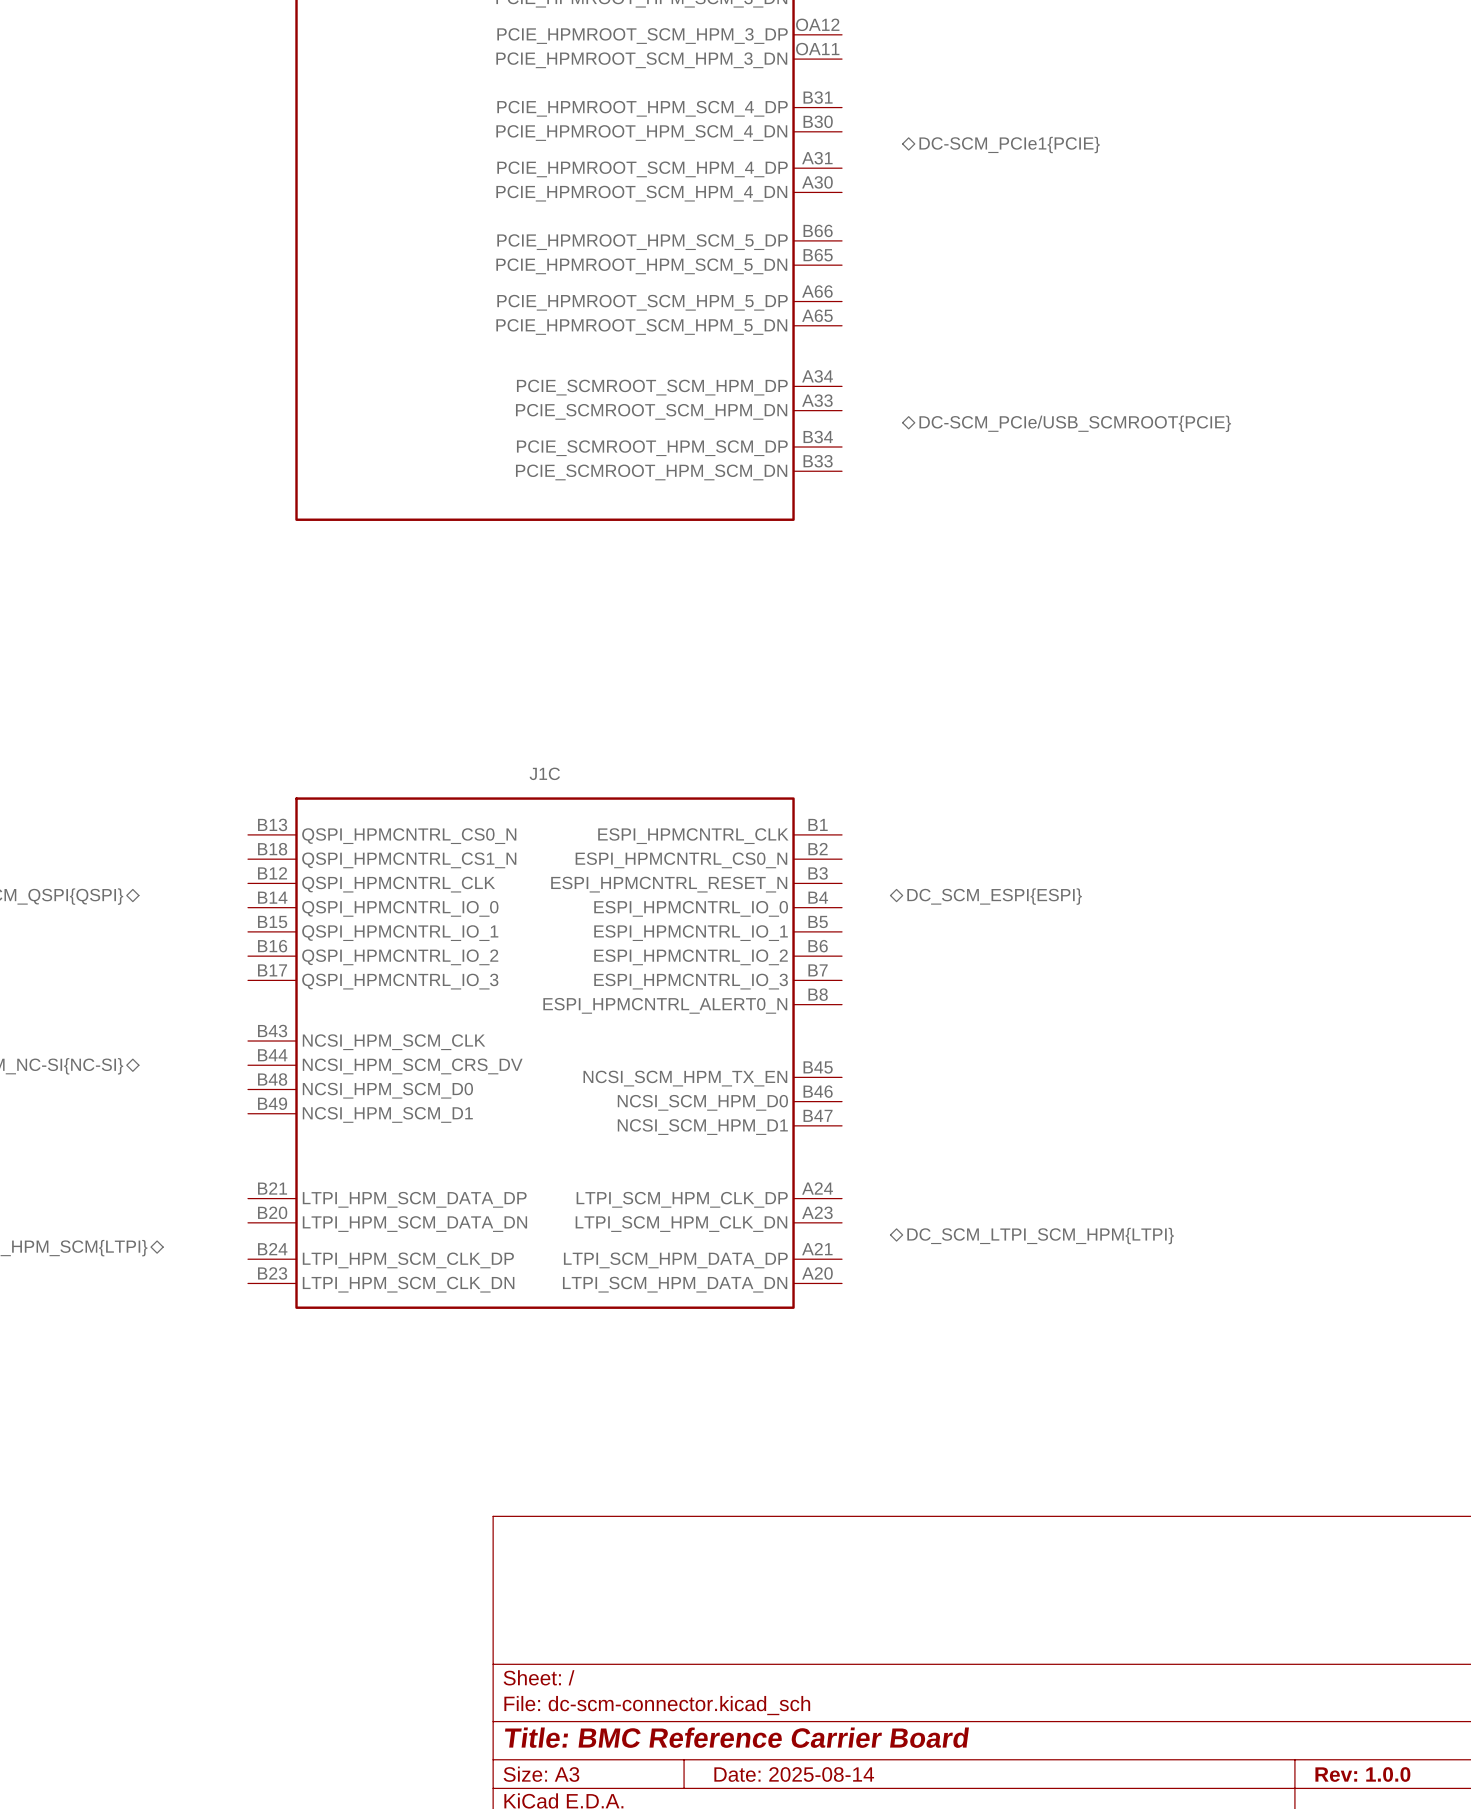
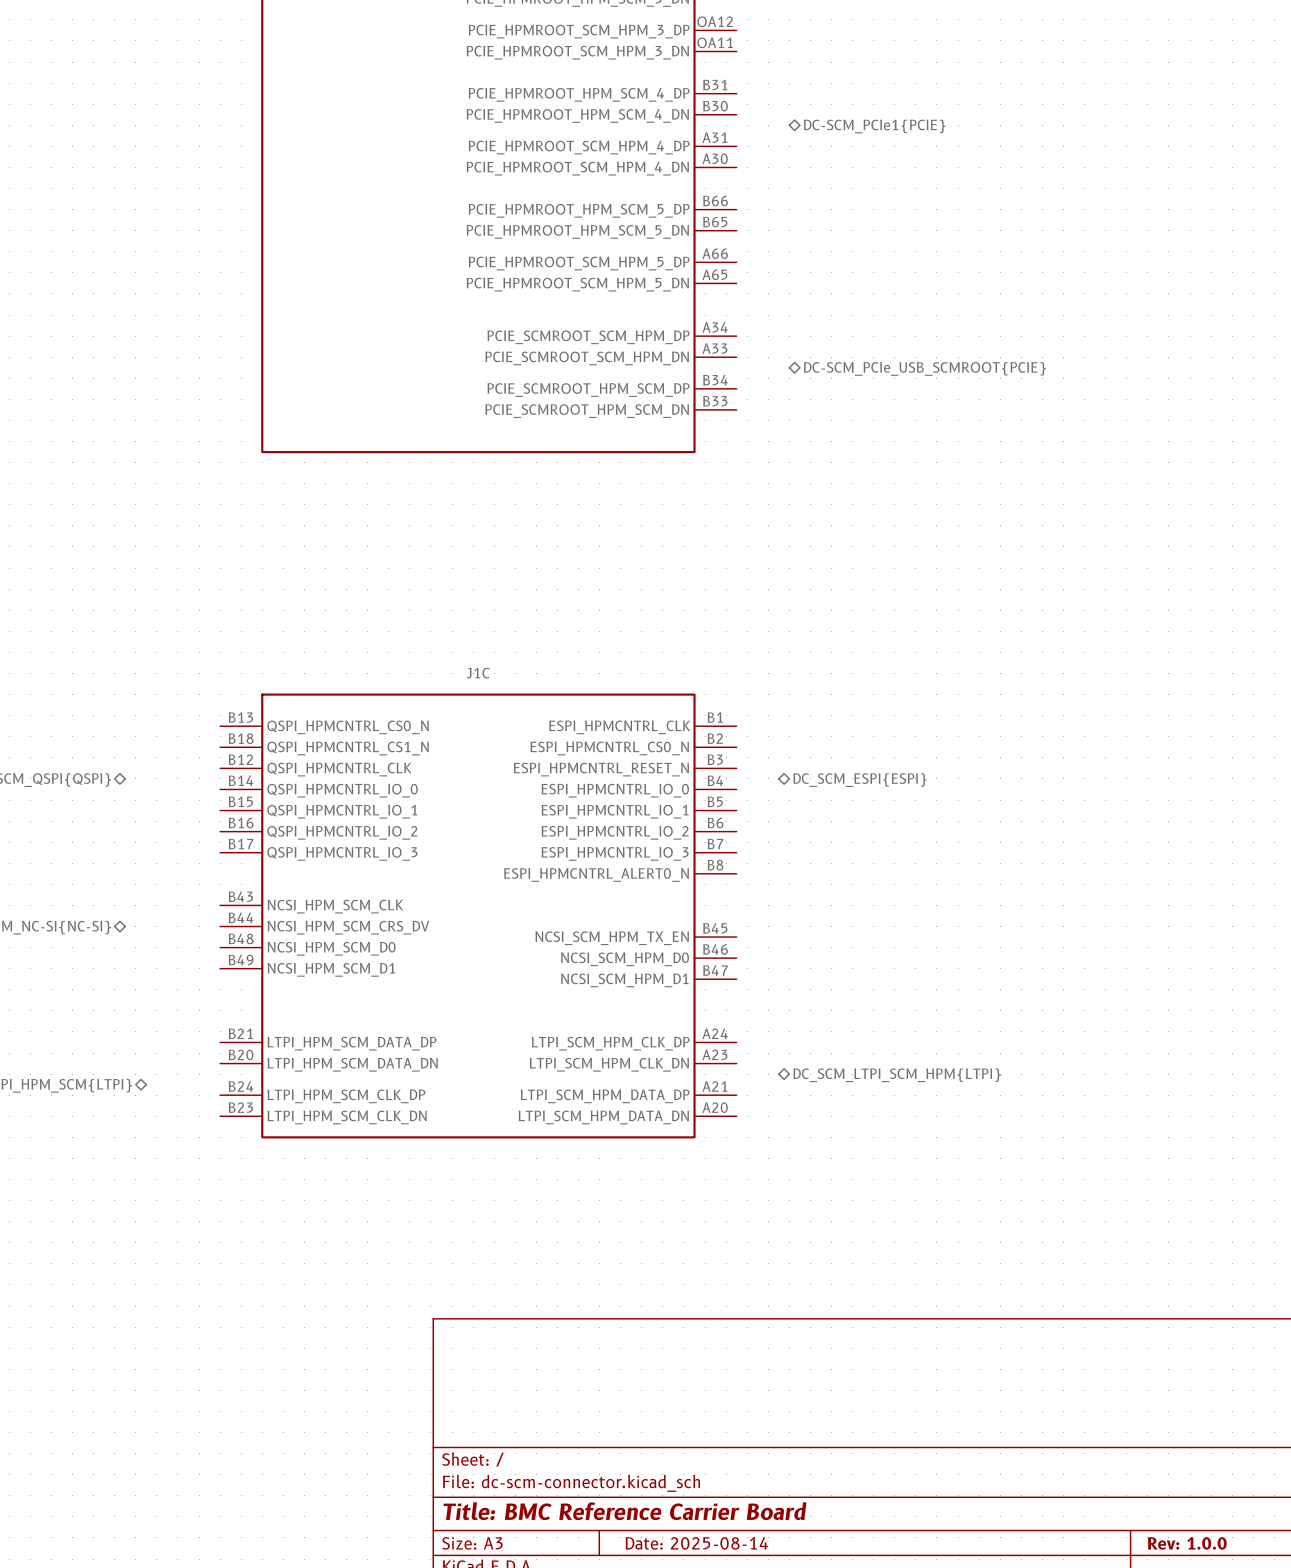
hierarchical label: DC-SCM_PCIe/USB_SCMROOT{PCIE} (1075, 423) -> DC-SCM_PCIe_USB_SCMROOT{PCIE} (924, 368)

